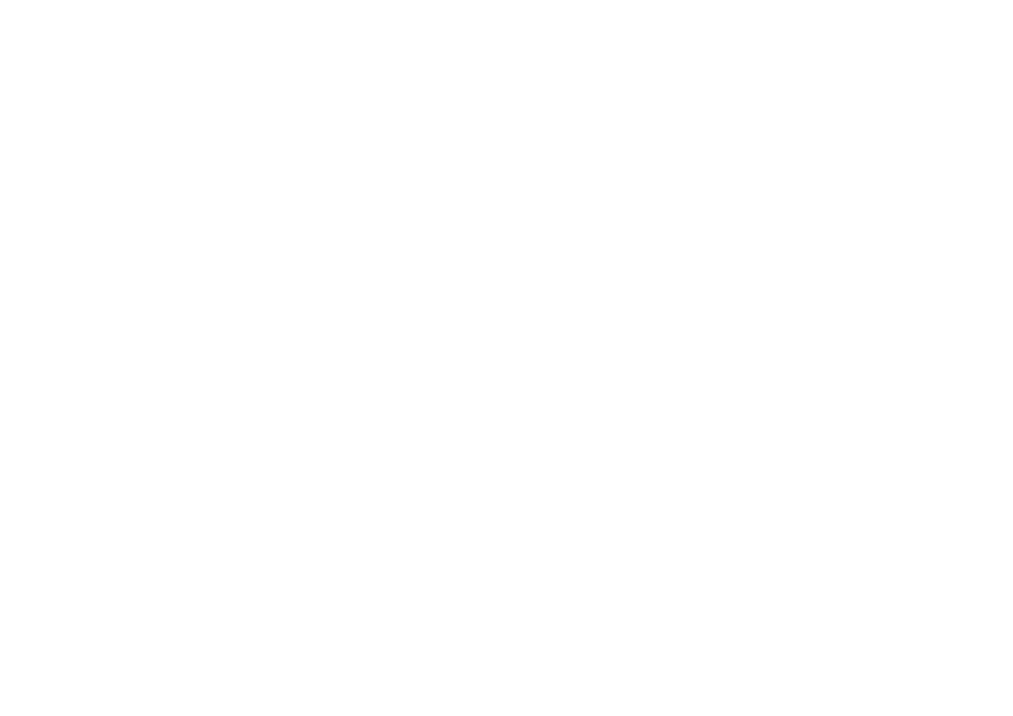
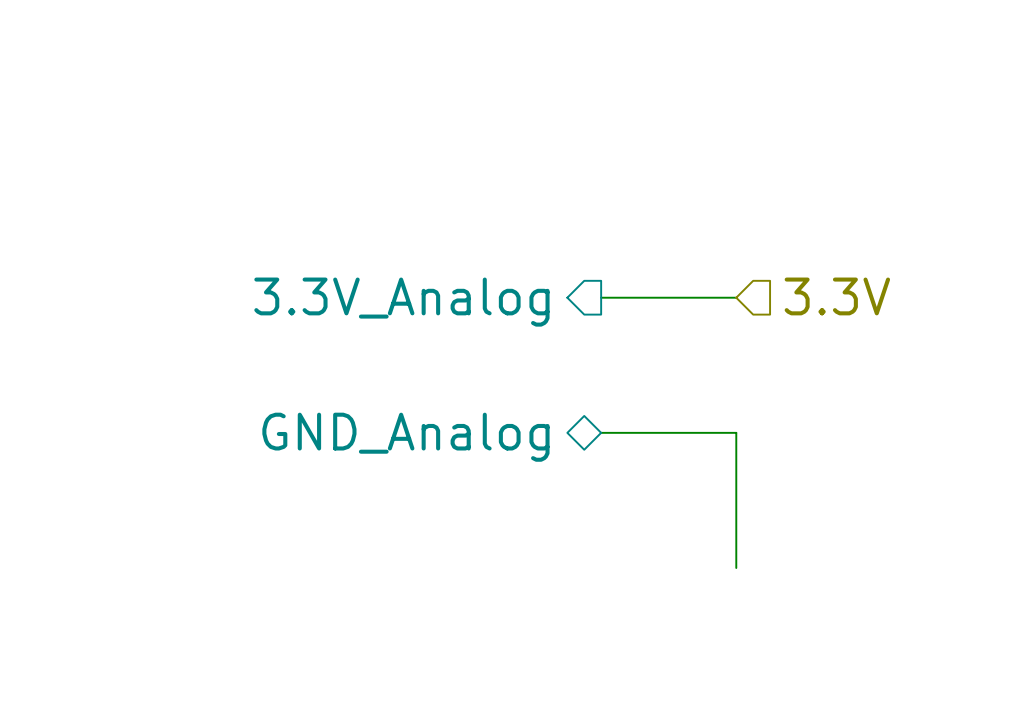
hierarchical label: none -> 3.3V (837, 296)
wire: none -> (601, 297) (736, 297)
sheet pin: none -> 3.3V_Analog (401, 302)
wire: none -> (601, 432) (736, 432) (736, 567)
sheet pin: none -> GND_Analog (405, 437)

